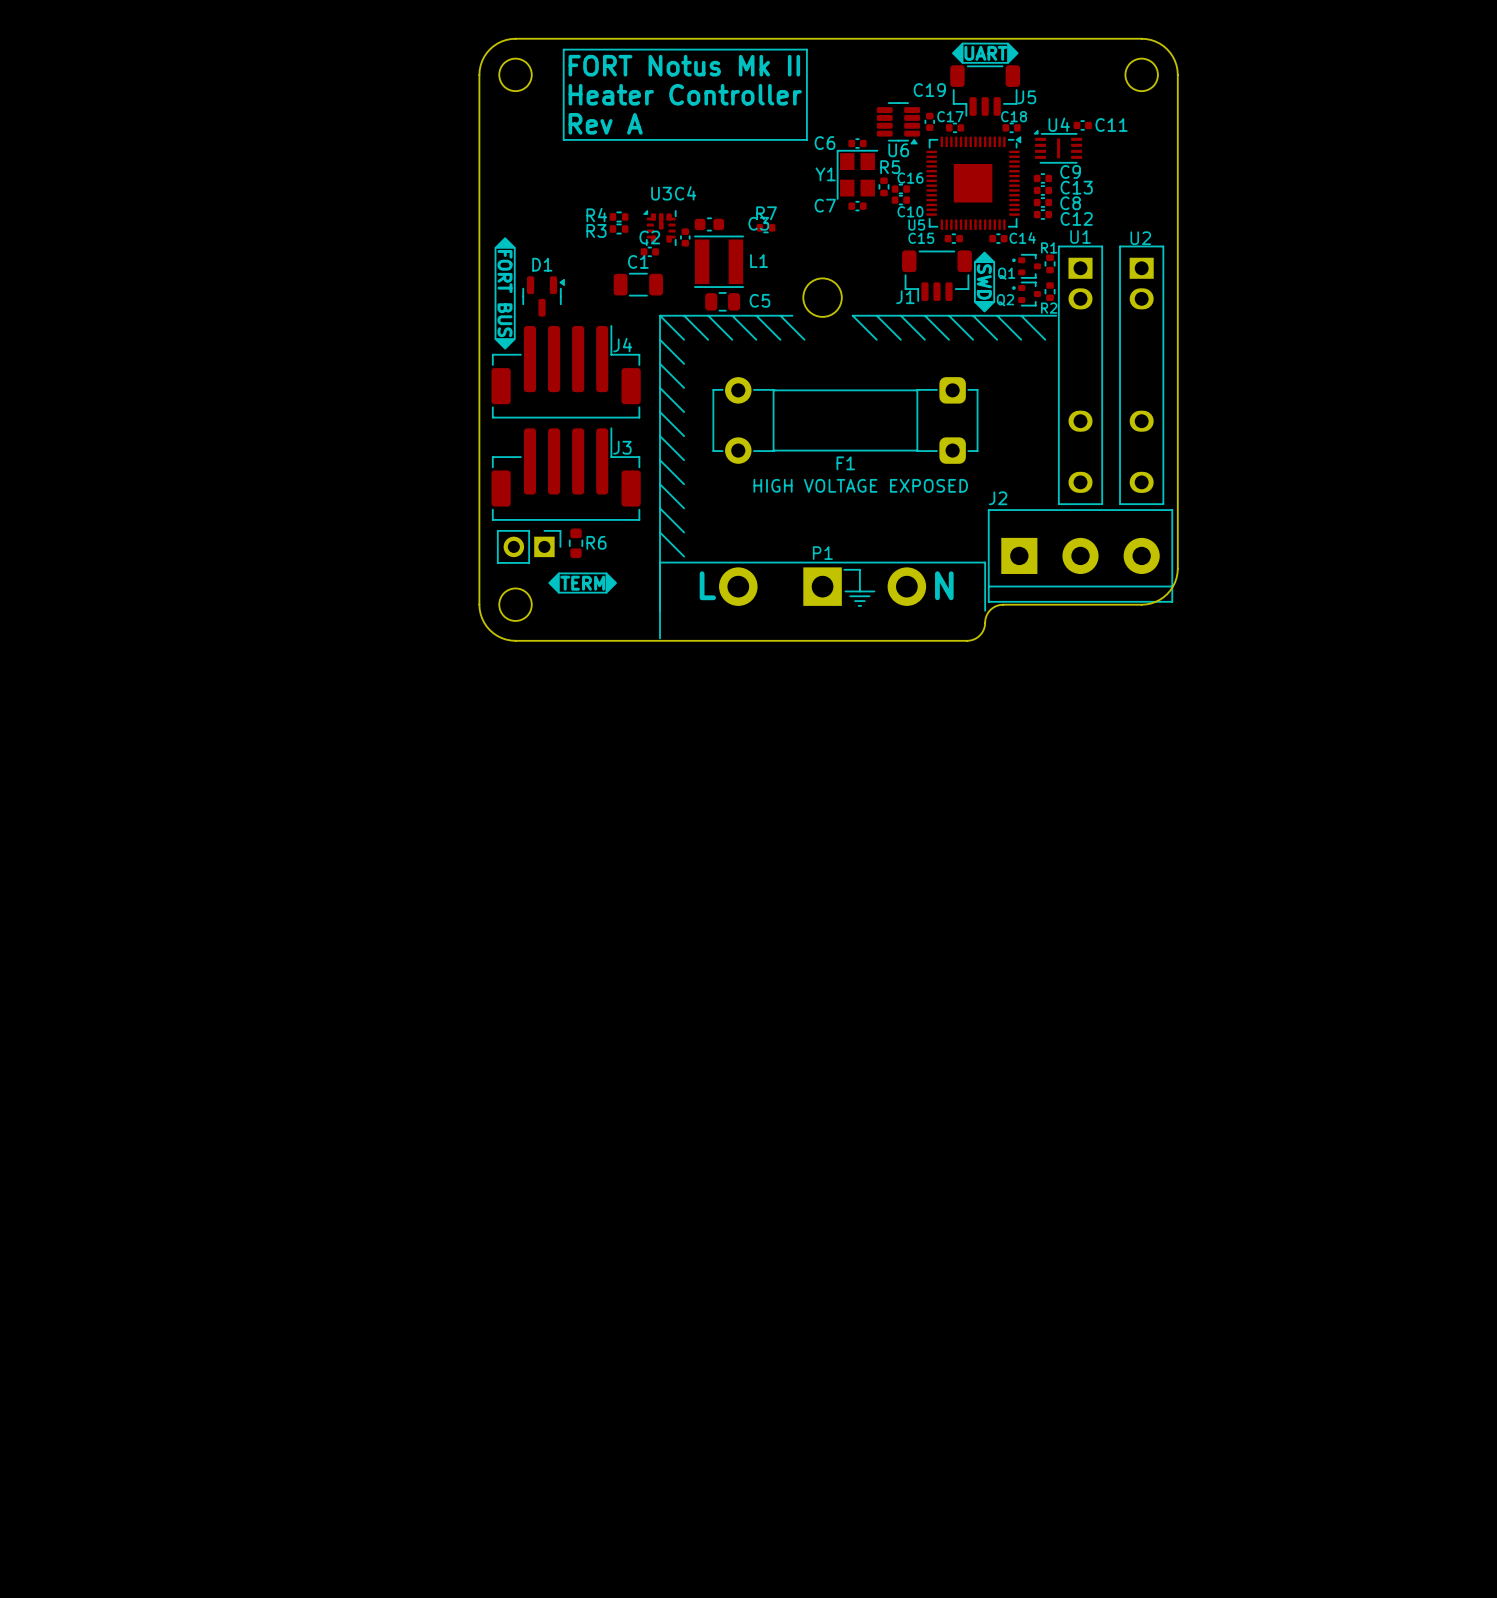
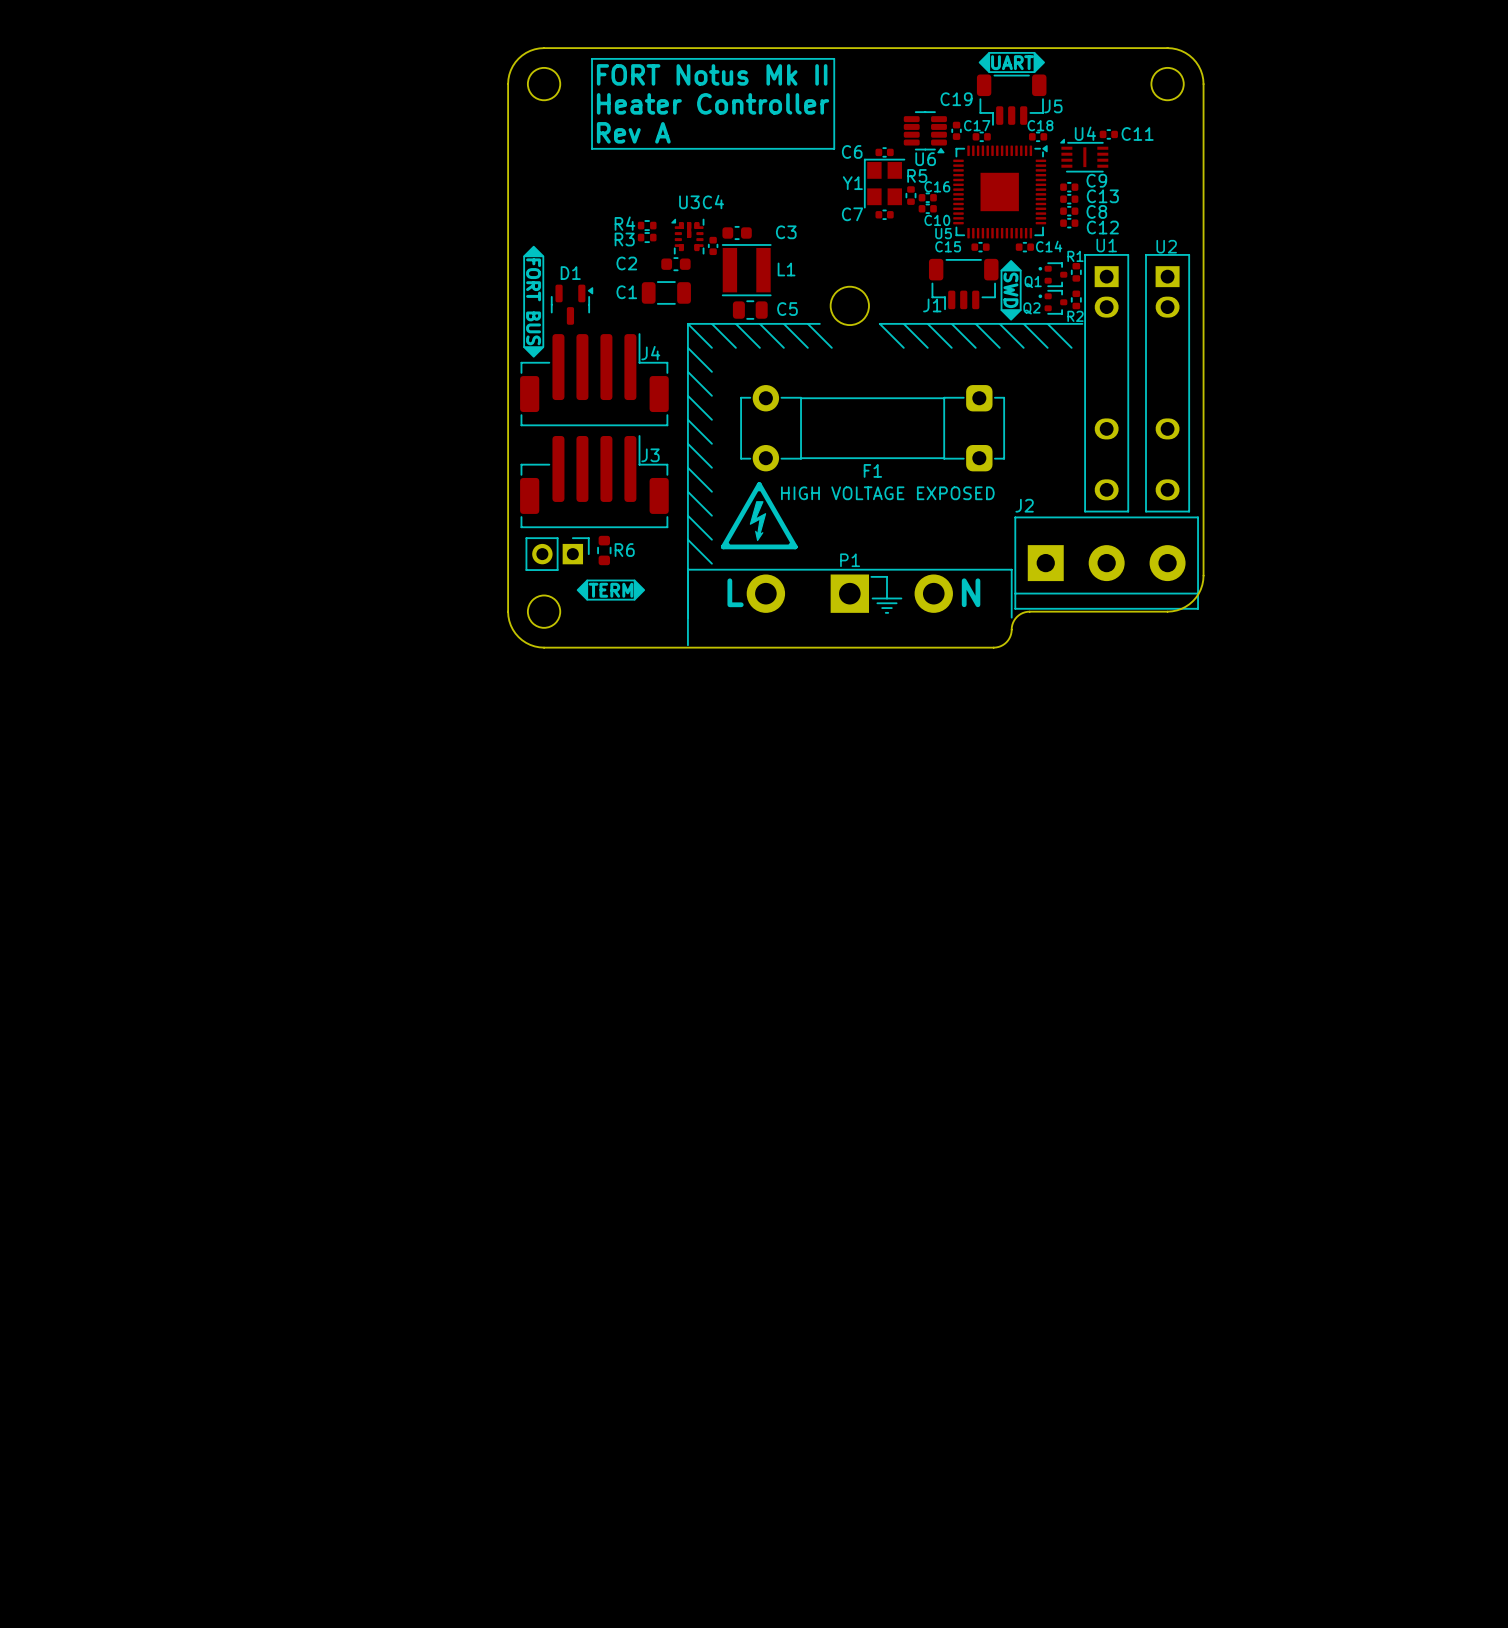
R7: (765, 227) -> none
C2 name position: C2 (649, 237) -> C2 (626, 263)
C2 footprint: [640, 246, 659, 257] -> [661, 257, 691, 272]
C1 name position: C1 (638, 261) -> C1 (626, 292)
drawing: none -> [720, 482, 798, 550]

